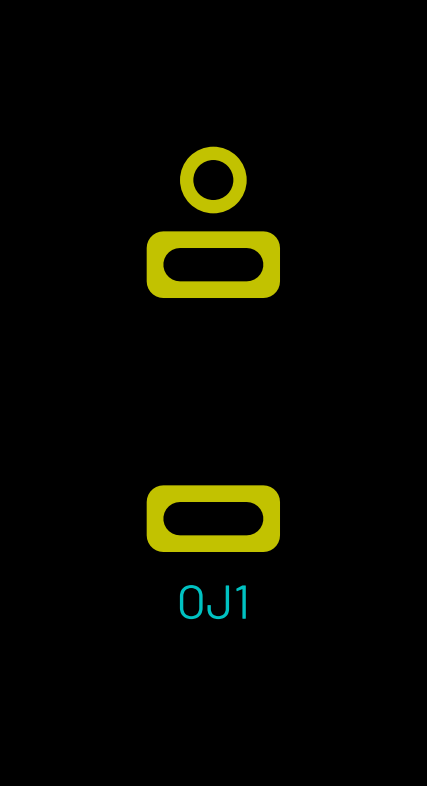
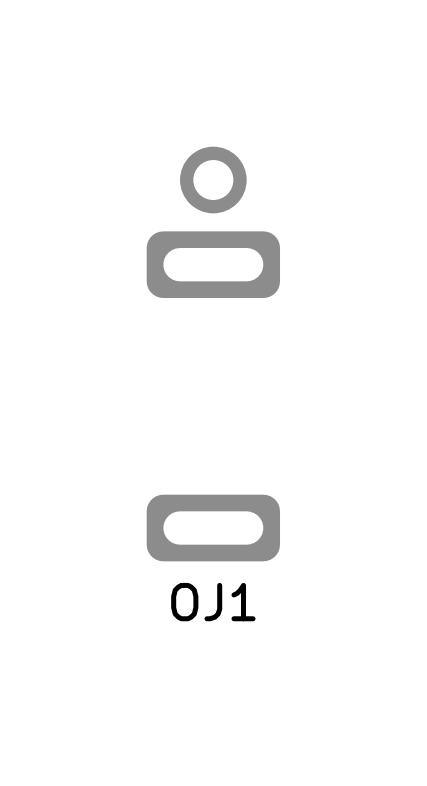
OJ1 footprint: [146, 146, 281, 553] -> [146, 146, 281, 562]

